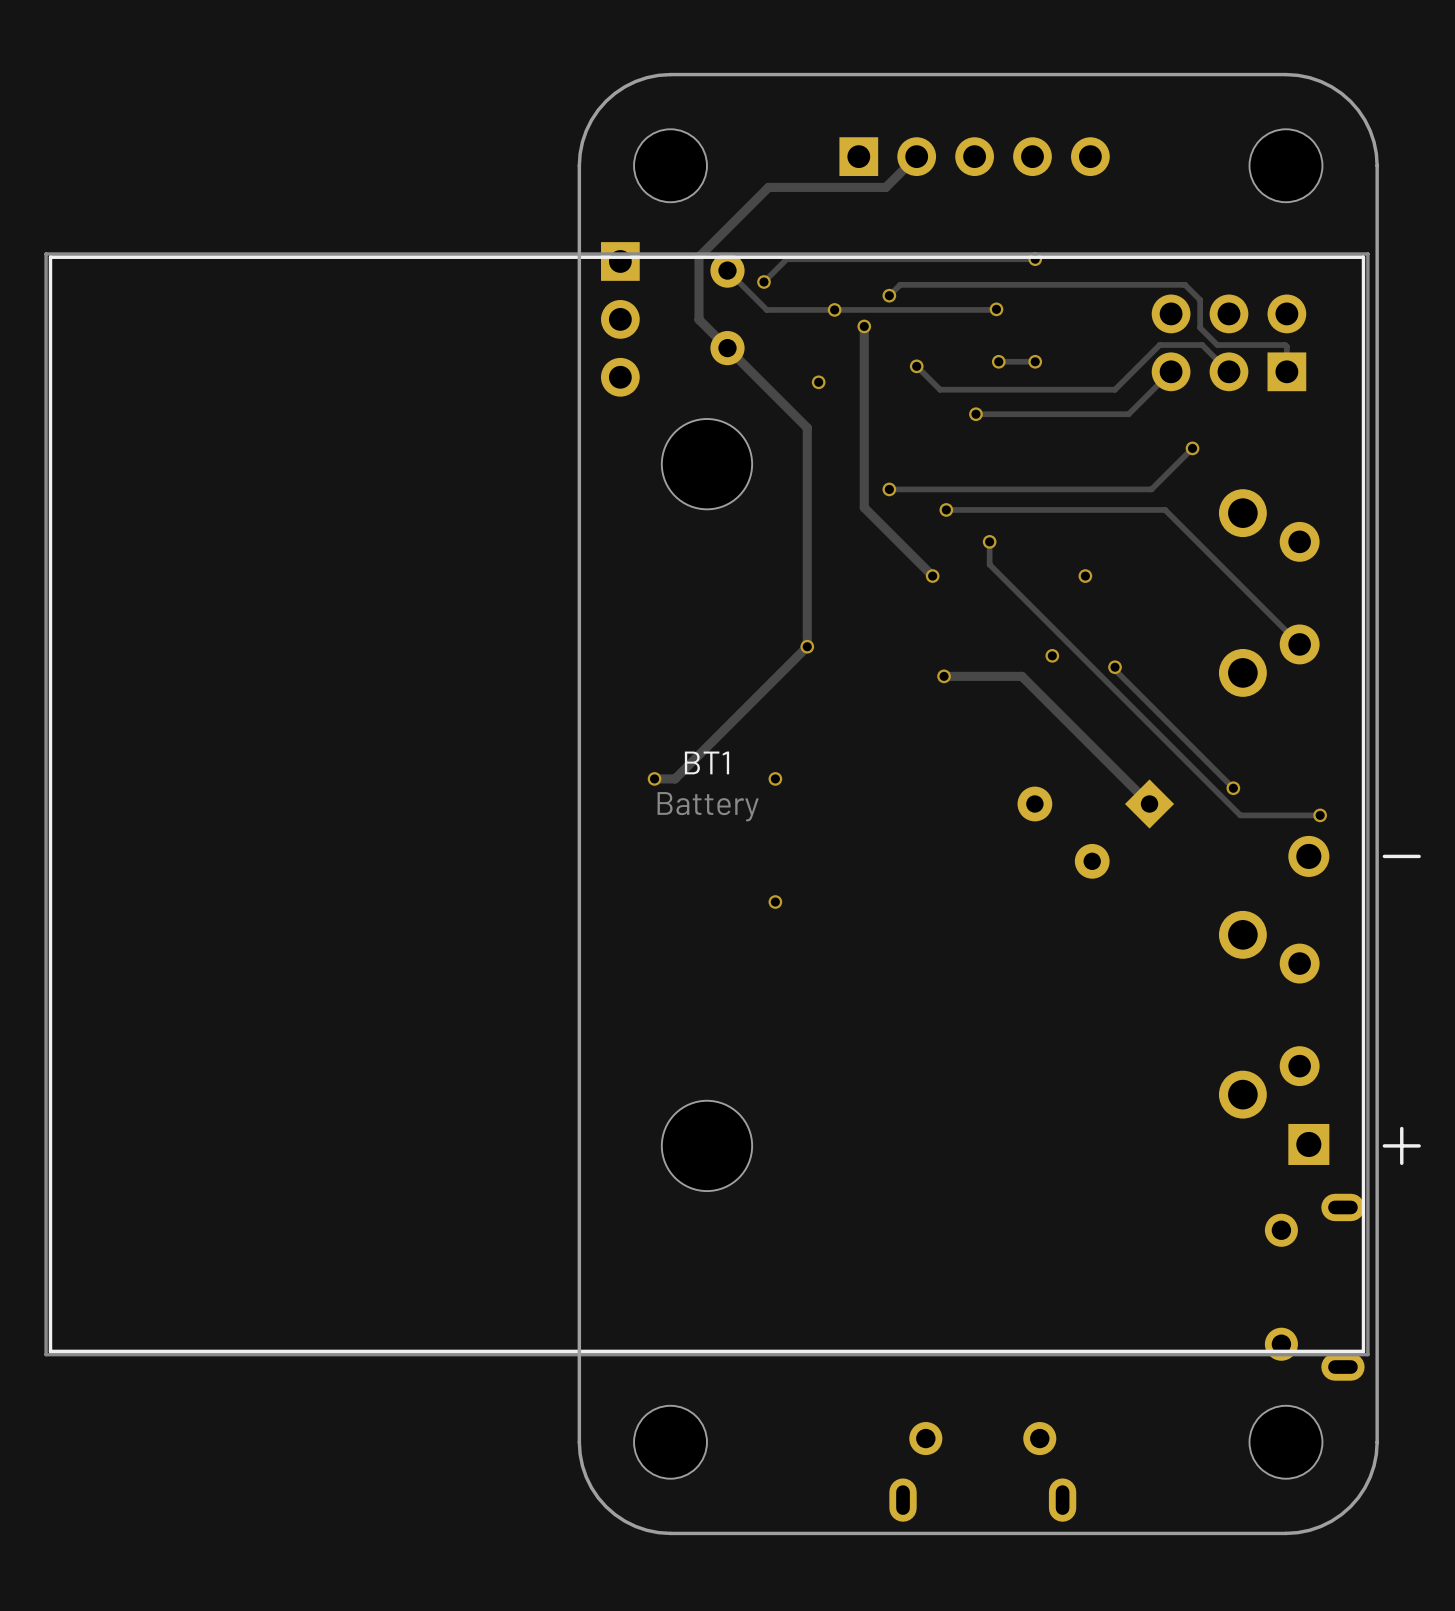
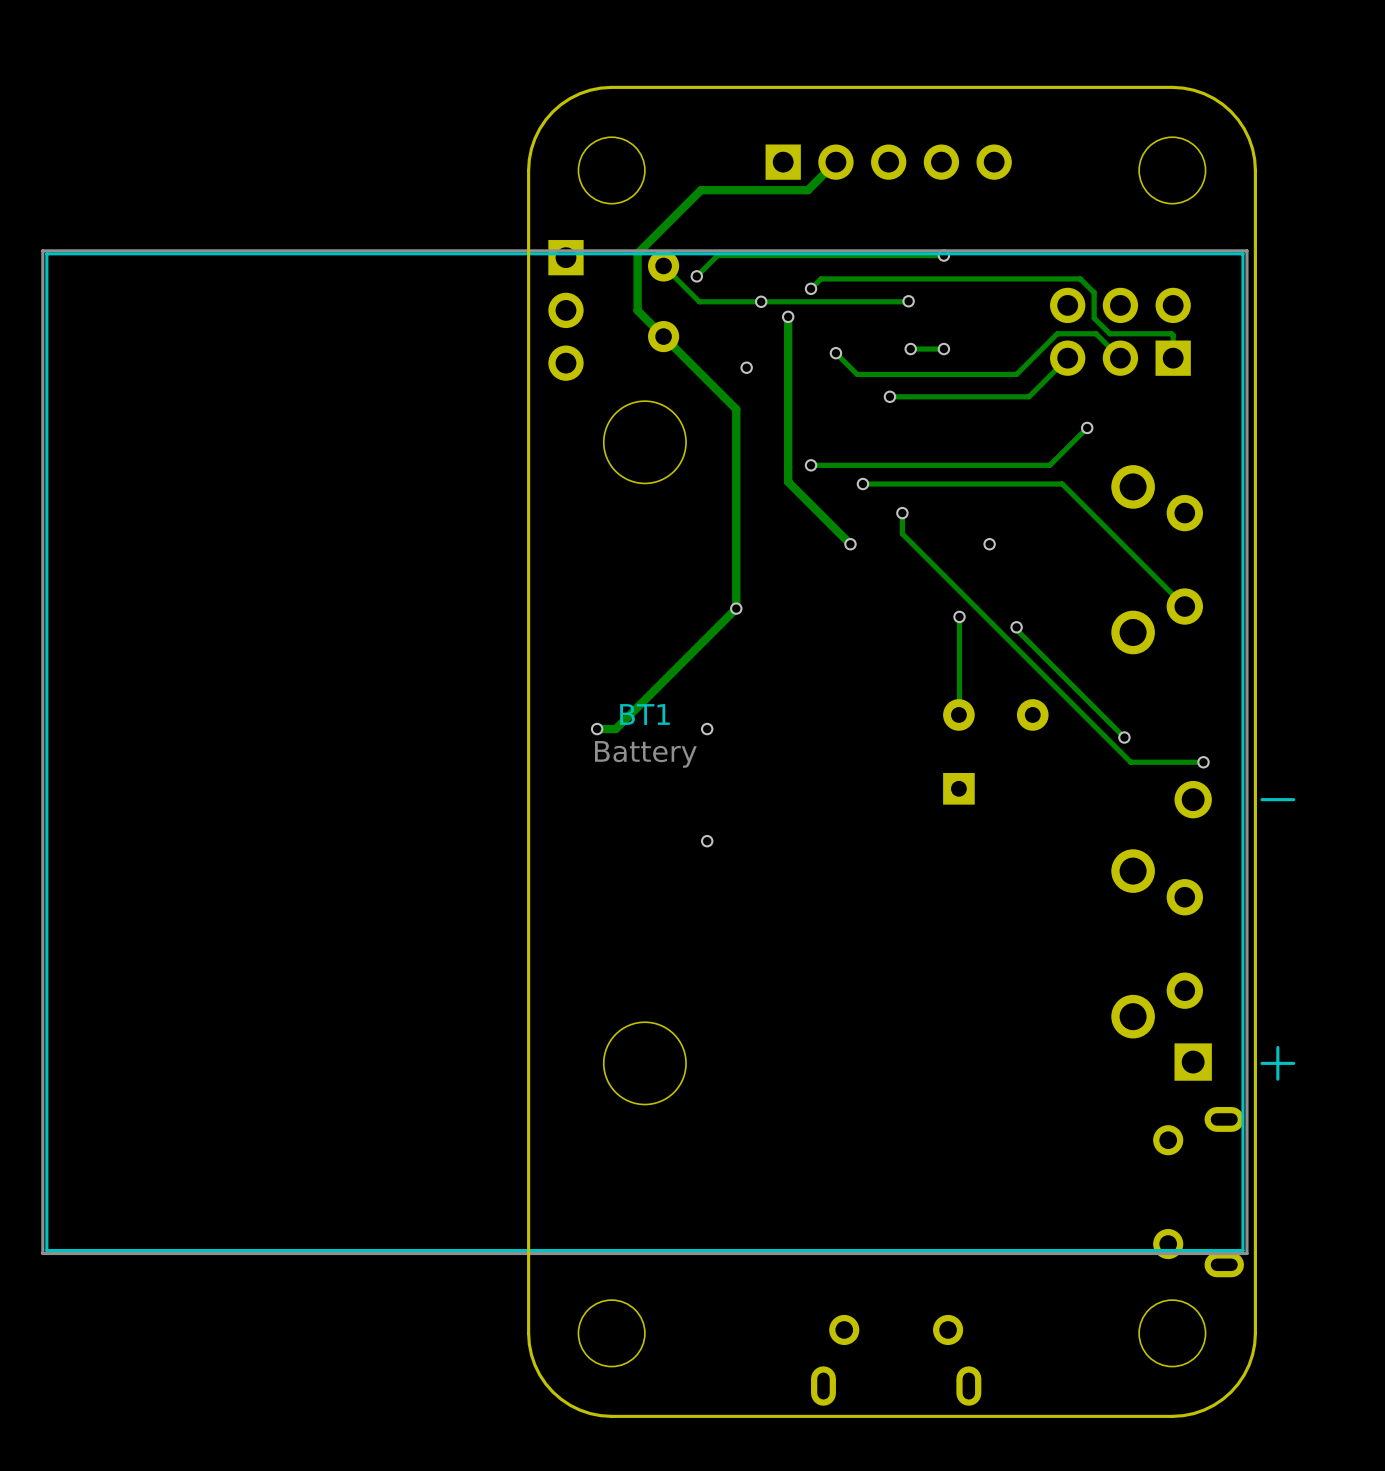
track: none -> (959, 616) (958, 714)
track: (944, 676) (1021, 676) (1149, 804) -> none
via: (944, 676) -> none
part: none -> (995, 751)
part: (1095, 829) -> none

